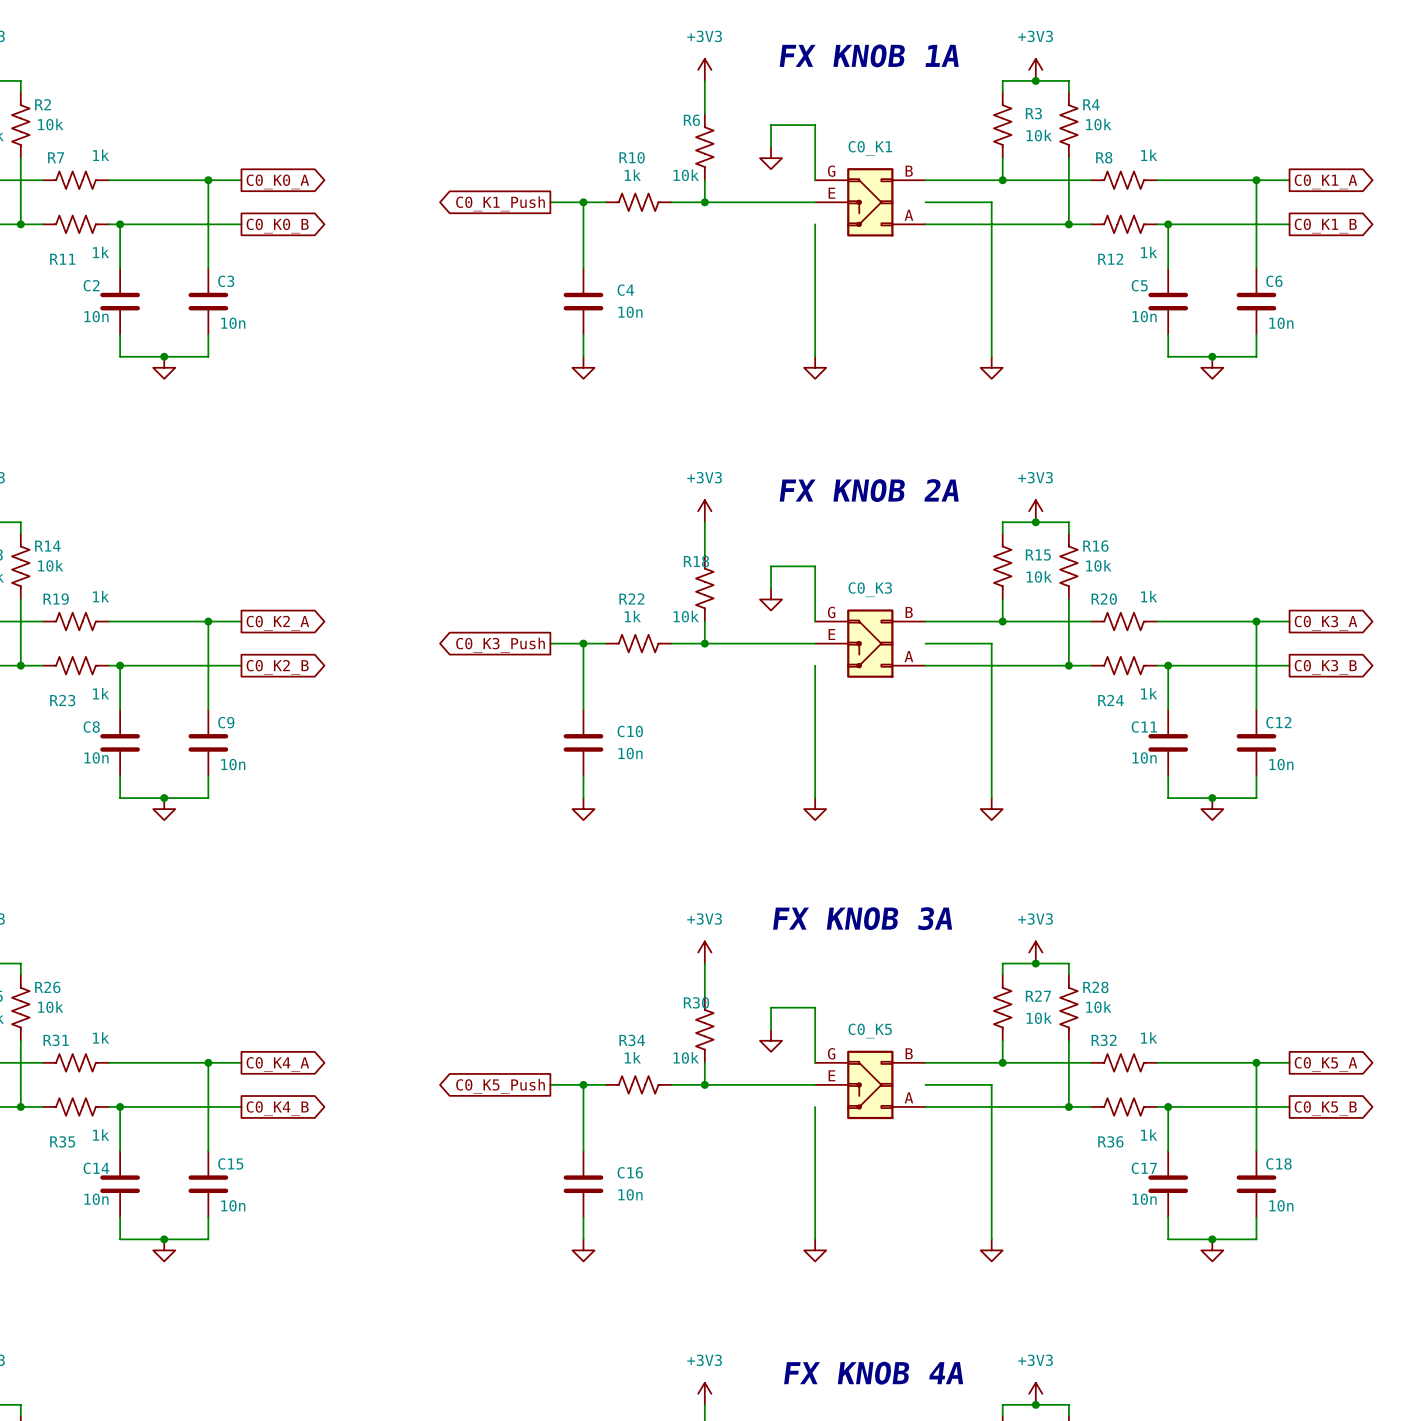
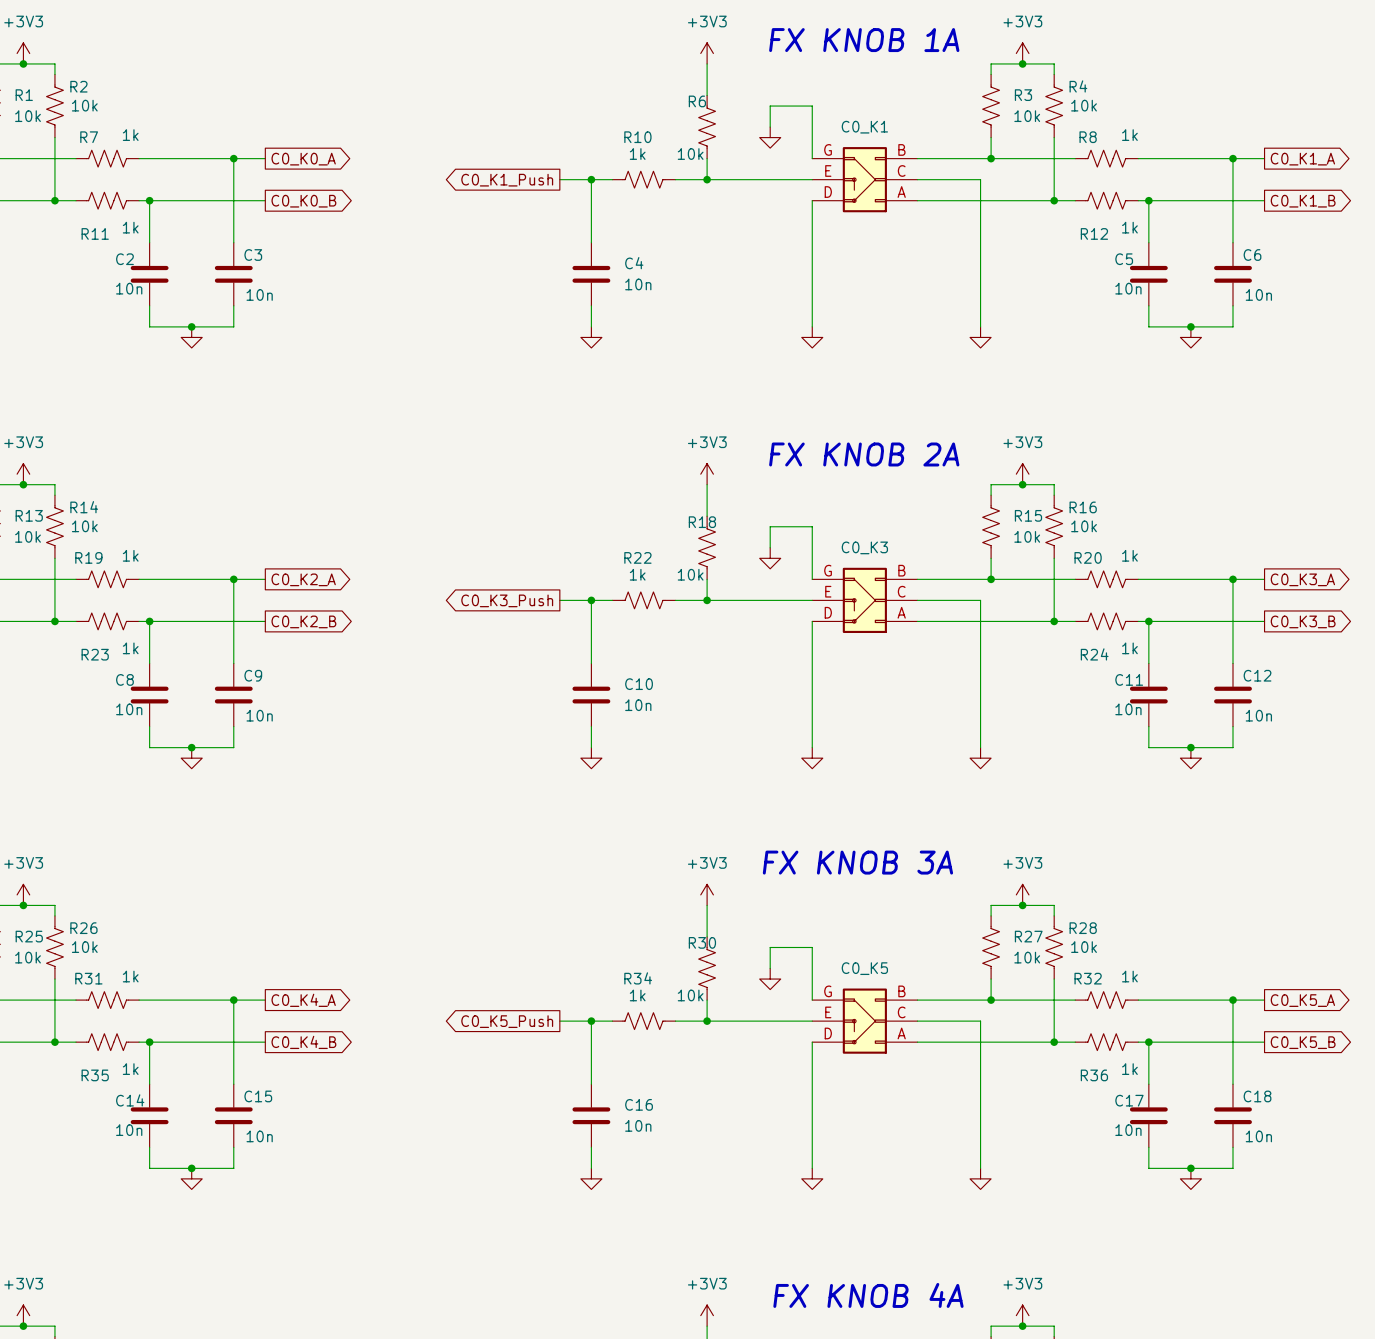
part symbol: [815, 168, 926, 237] -> [812, 147, 918, 213]
part symbol: [815, 609, 926, 678] -> [812, 567, 918, 633]
part symbol: [815, 1050, 926, 1120] -> [812, 988, 918, 1054]

